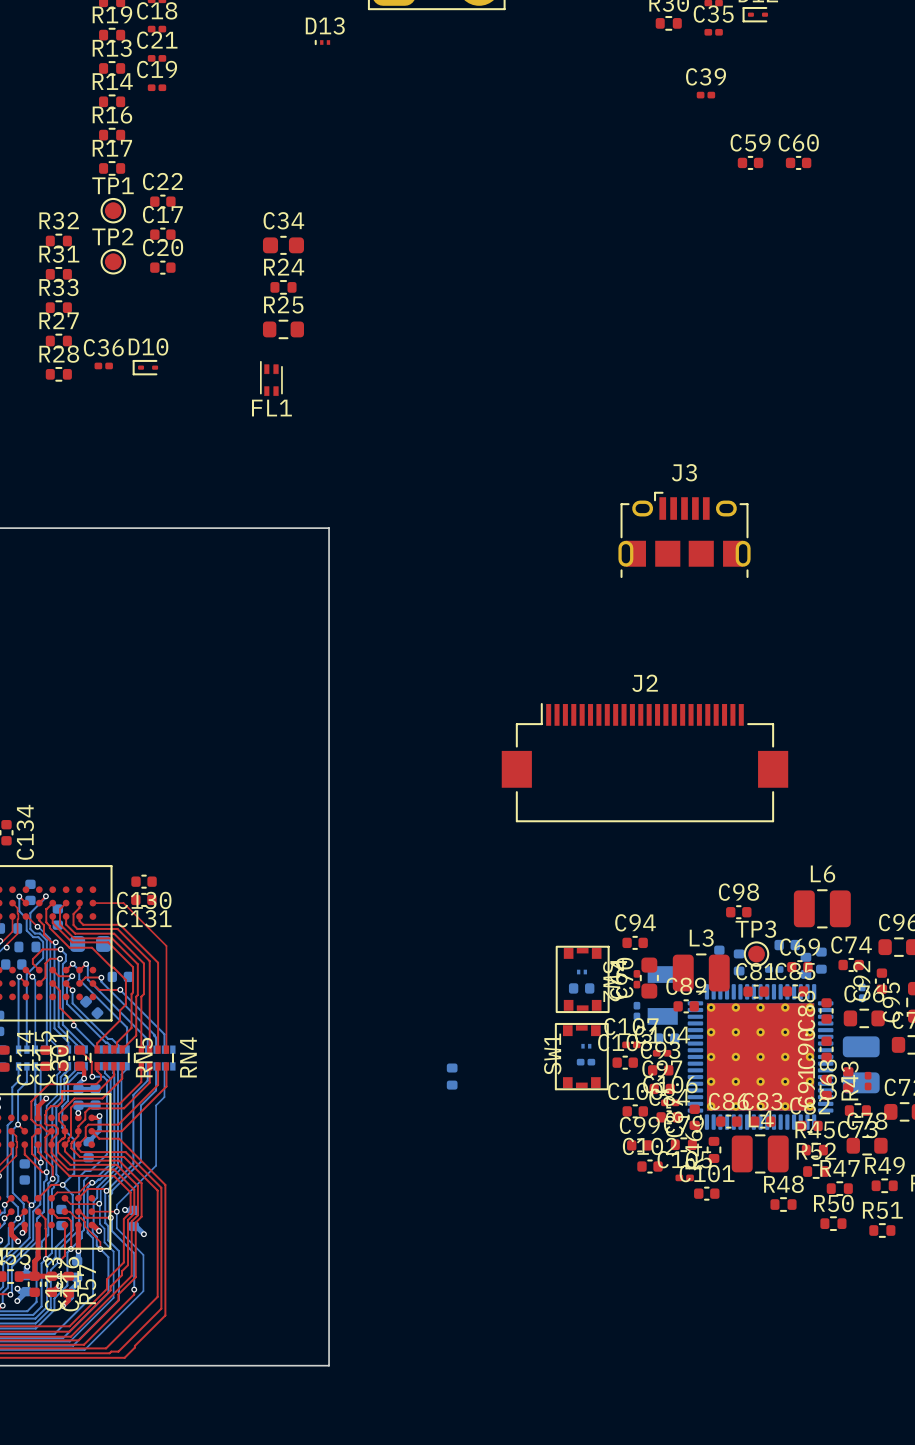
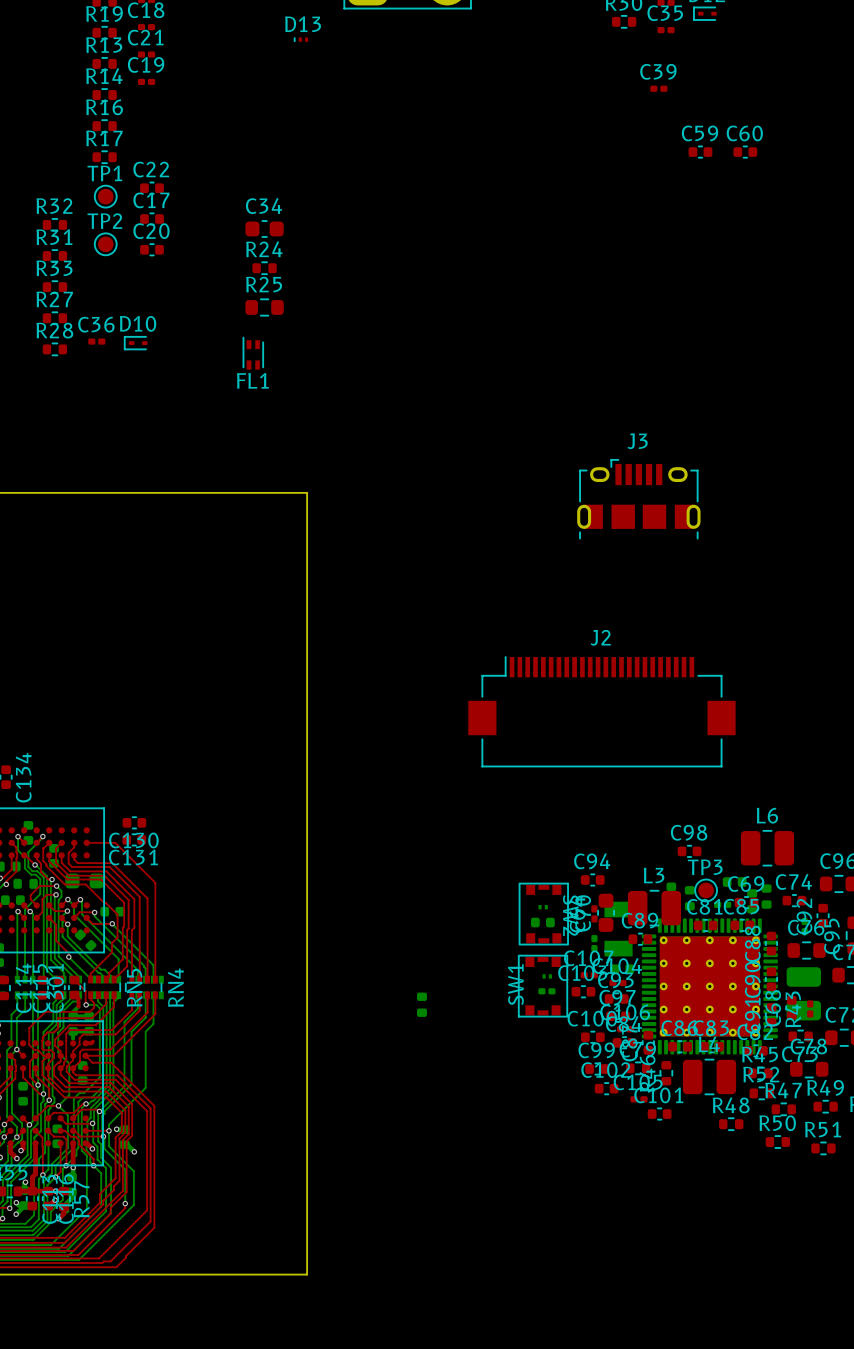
via: (84, 1078) -> none
top track: (46, 1098) (38, 1106) (38, 1117) -> none
via: (46, 1098) -> none
via: (78, 1113) -> none
bottom track: (99, 1116) (99, 1130) (88, 1141) -> none
via: (99, 1116) -> none

